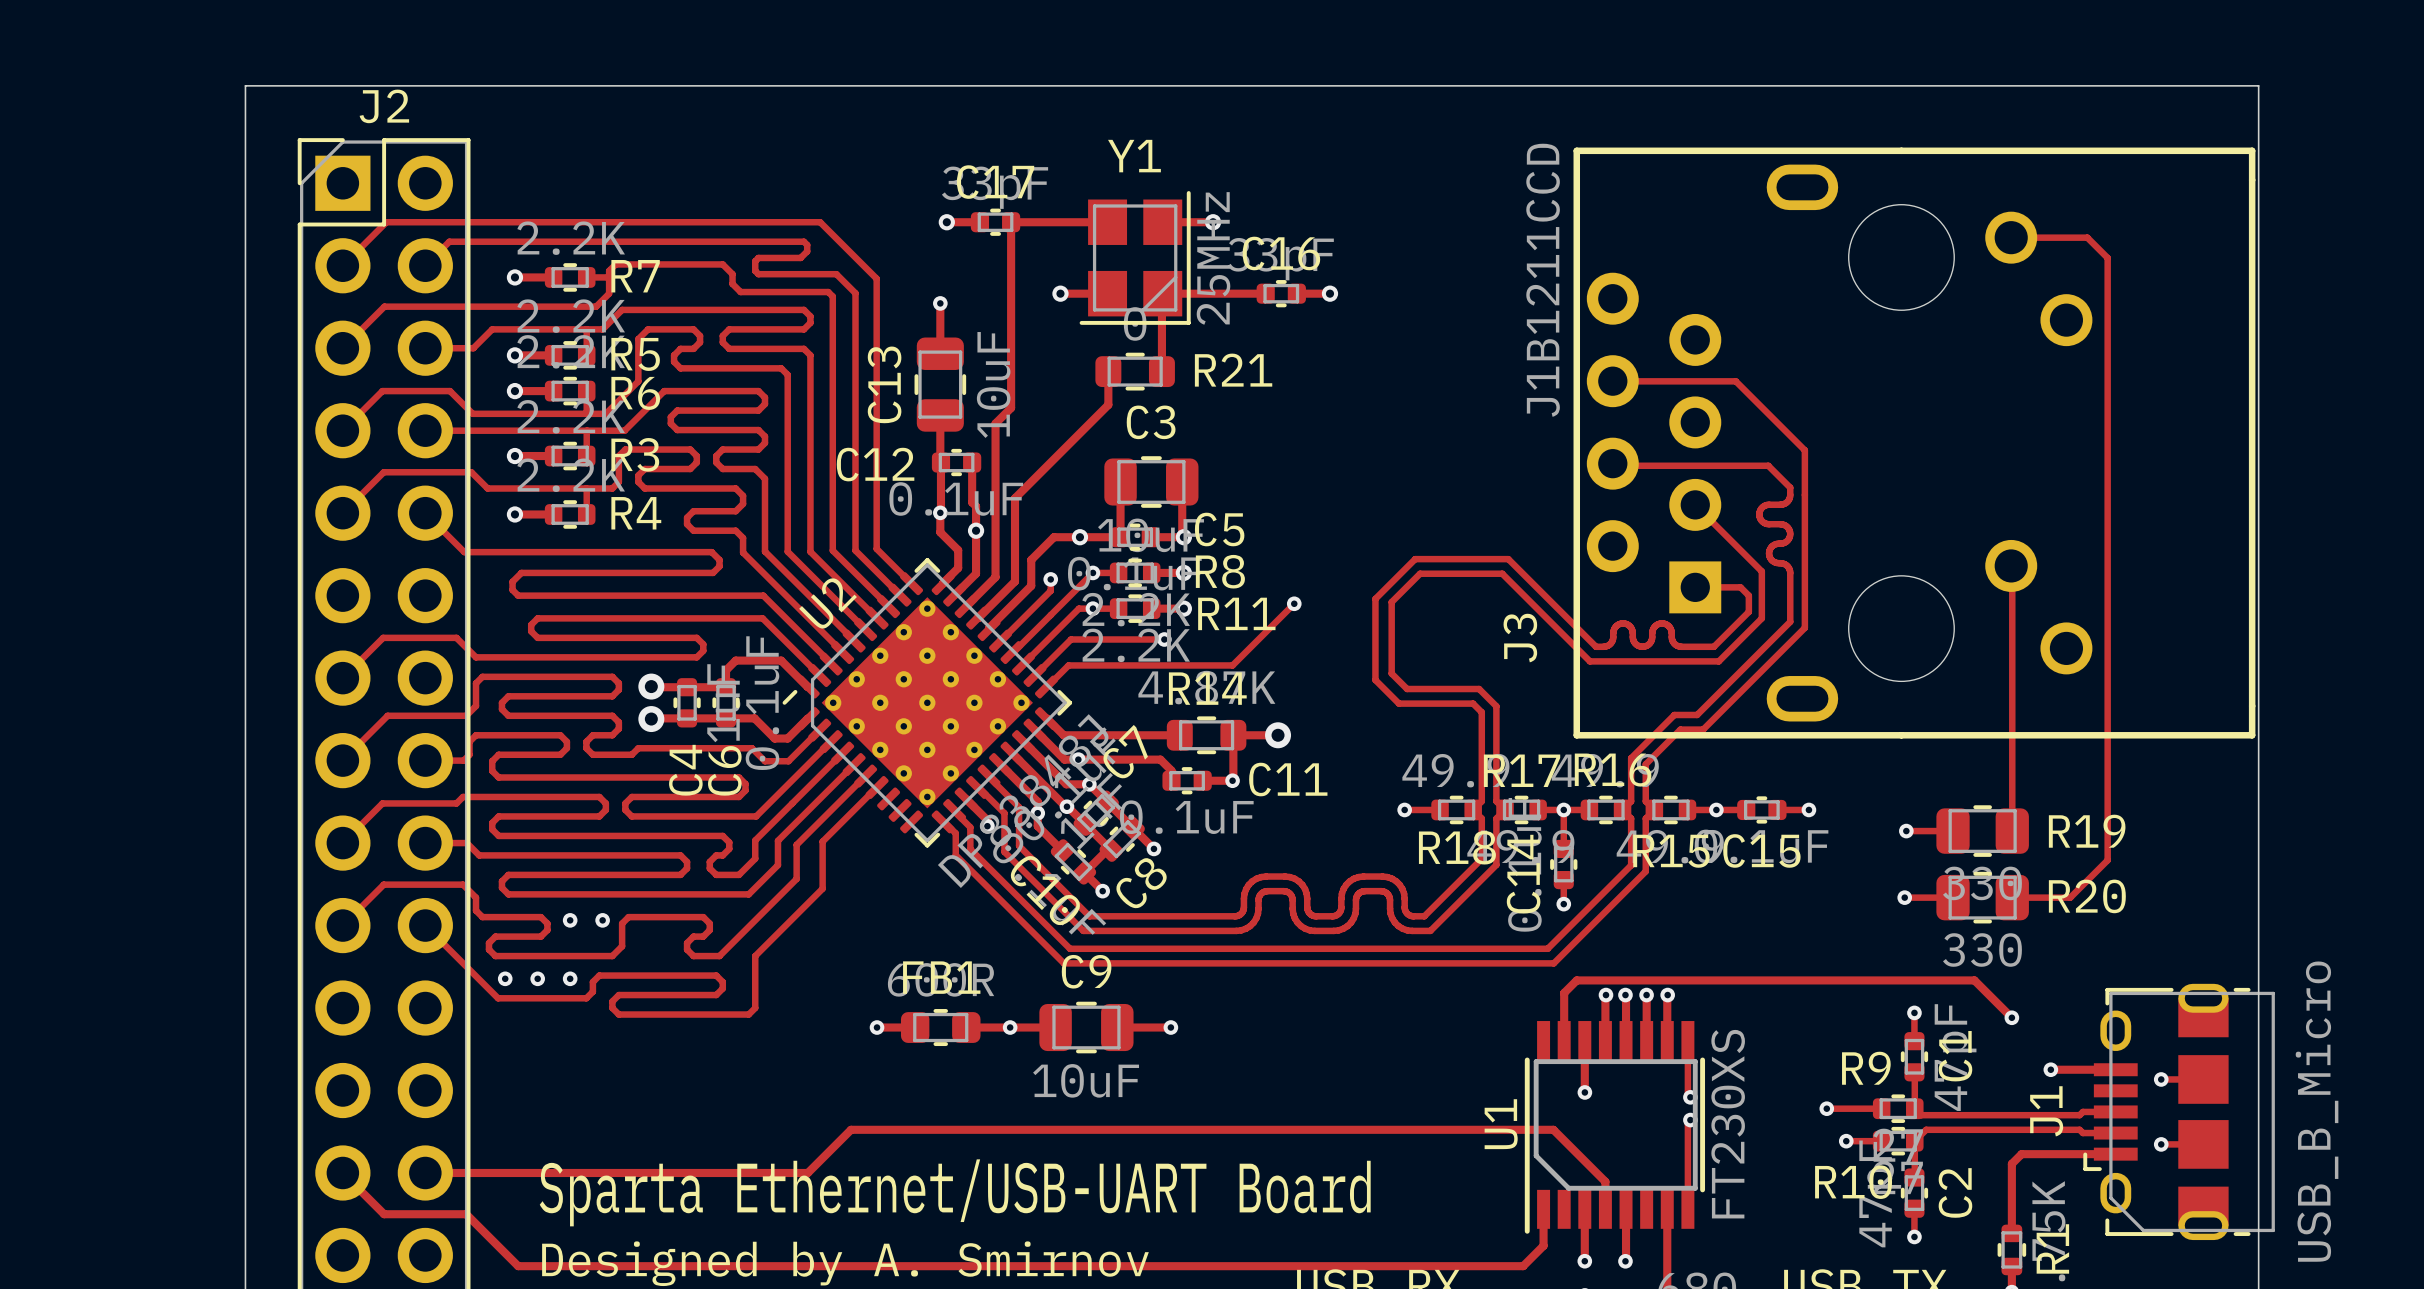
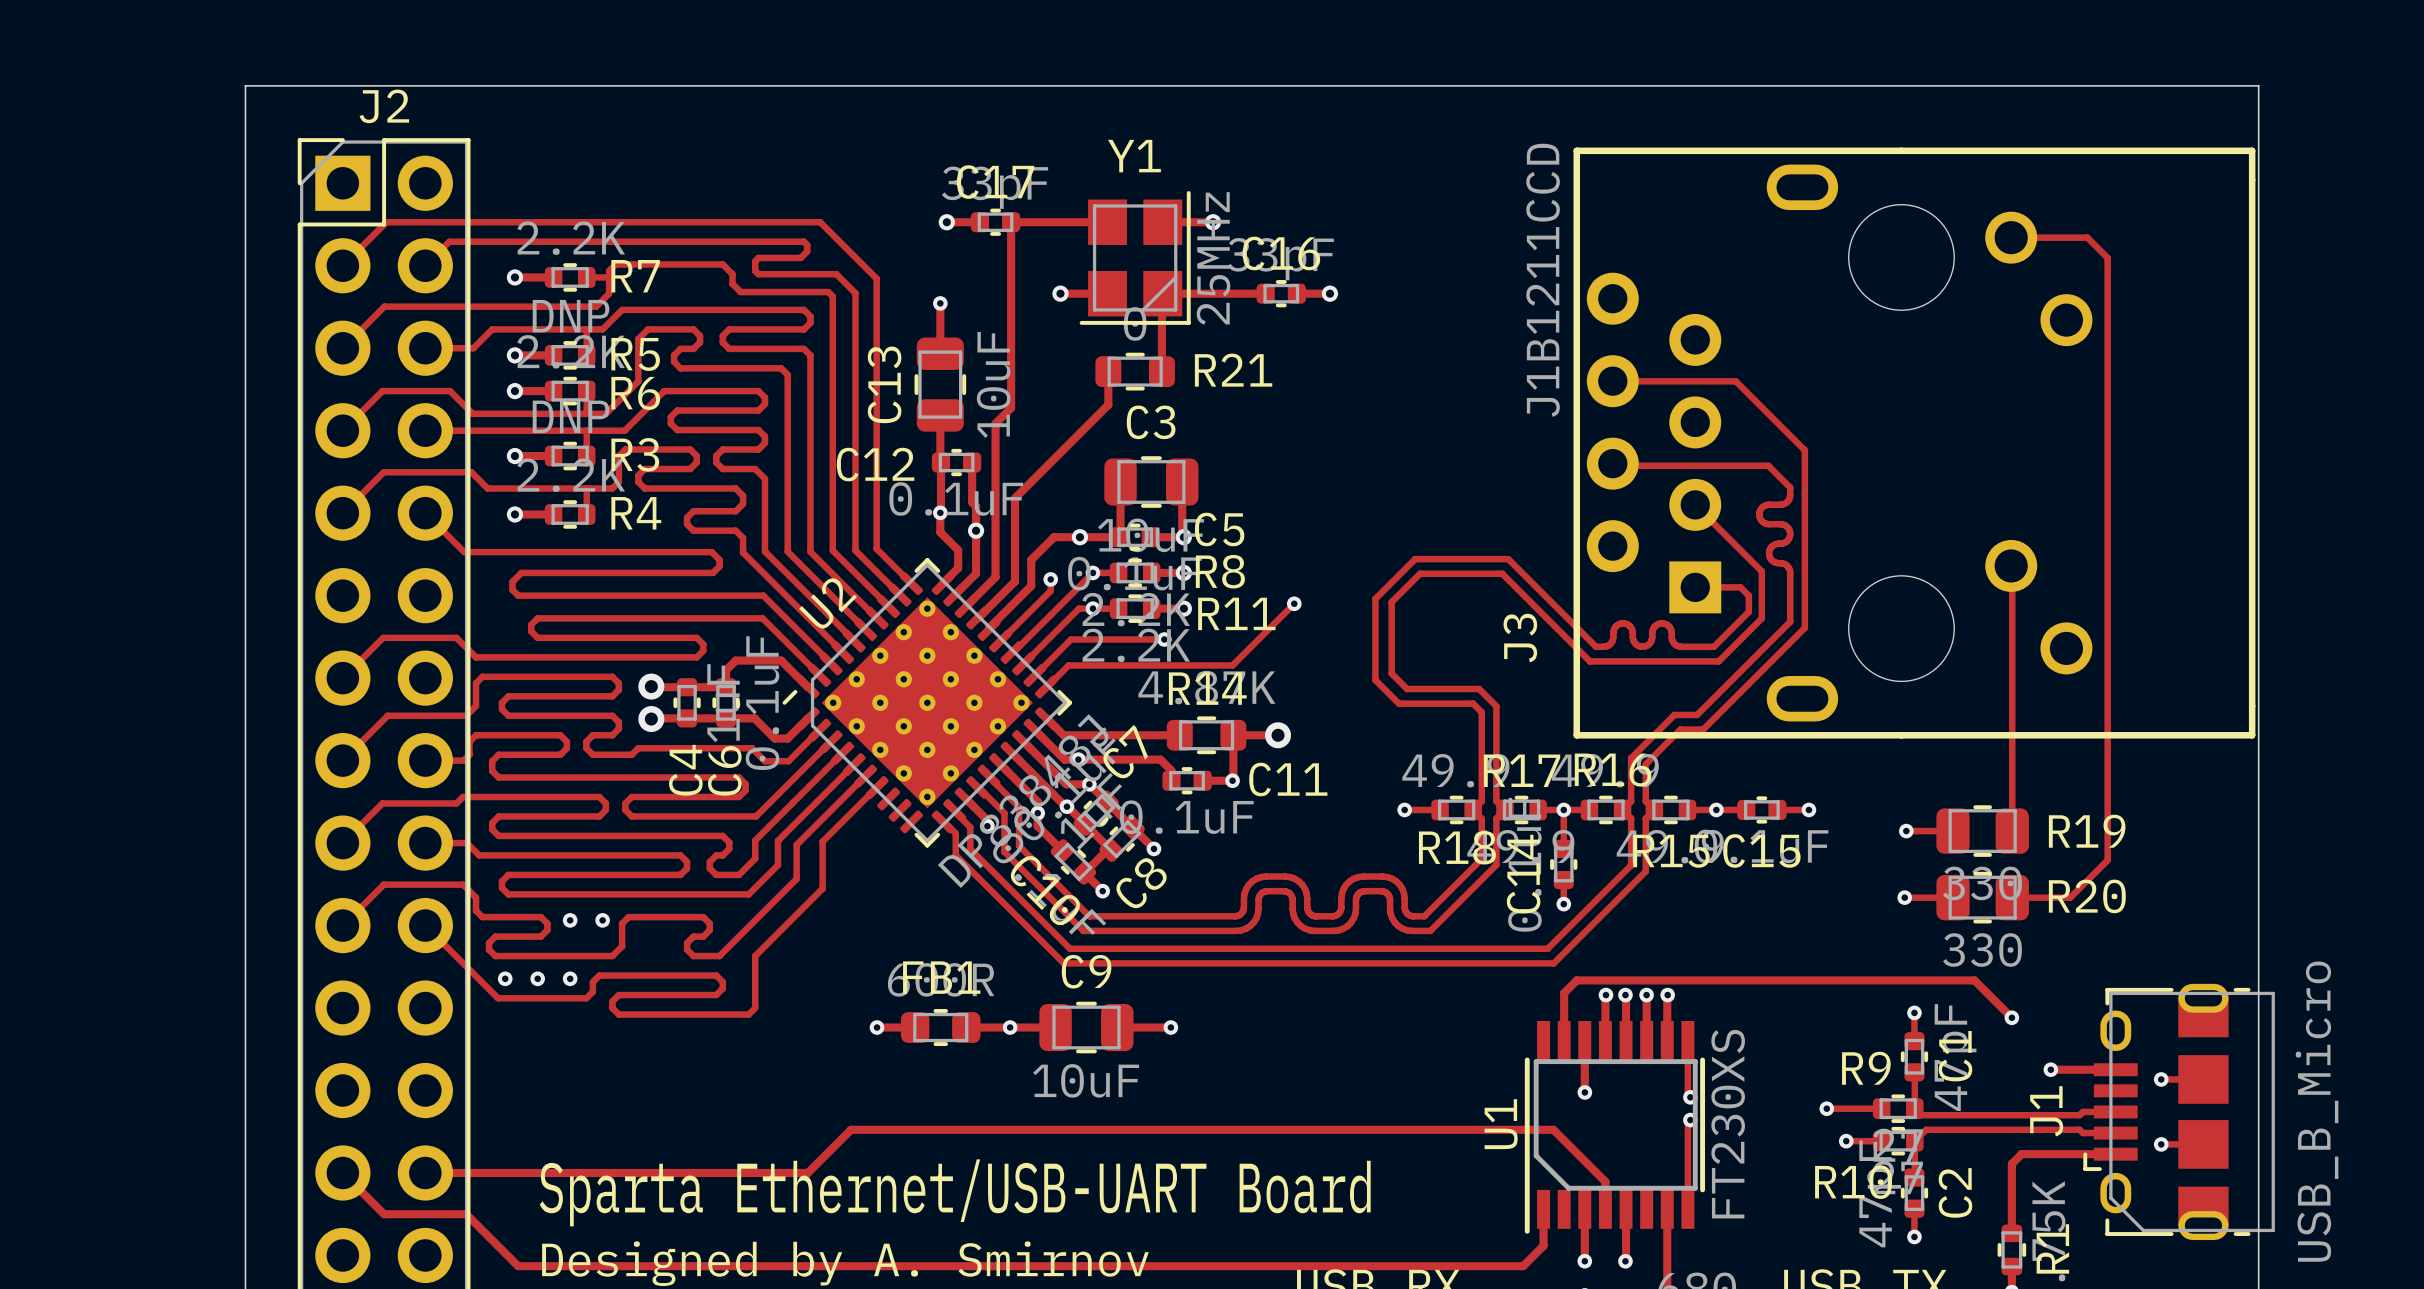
R5 value: 2.2K (571, 316) -> DNP (571, 316)
R3 value: 2.2K (571, 416) -> DNP (571, 416)

